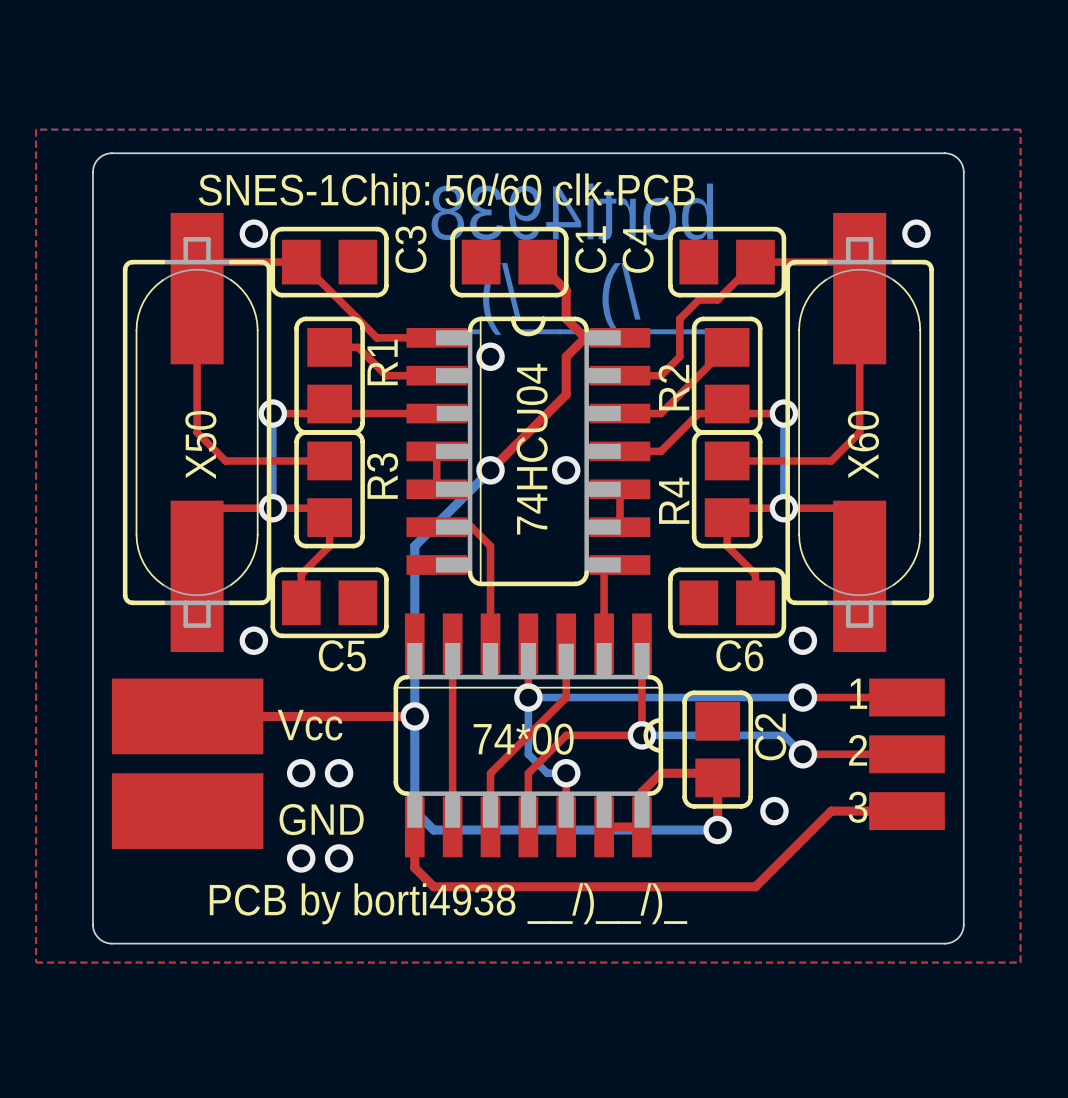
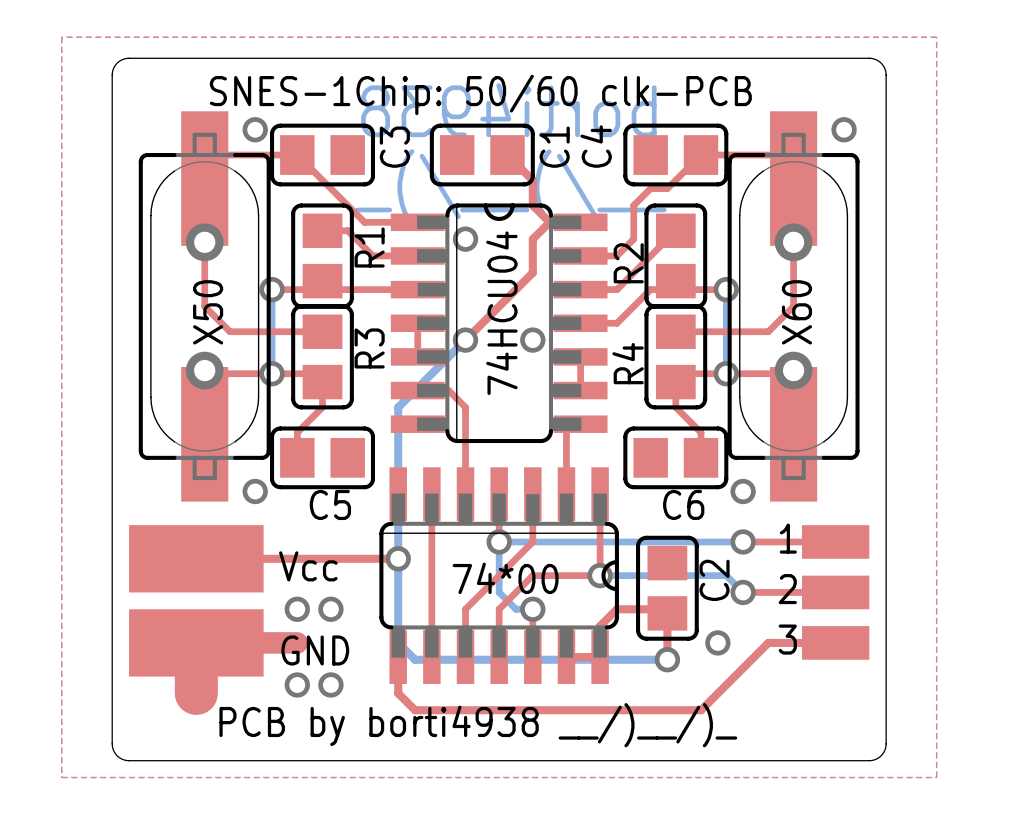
via: none -> (204, 242)
via: none -> (793, 242)
via: none -> (204, 370)
via: none -> (793, 370)
top track: none -> (297, 642) (196, 642) (196, 693)

